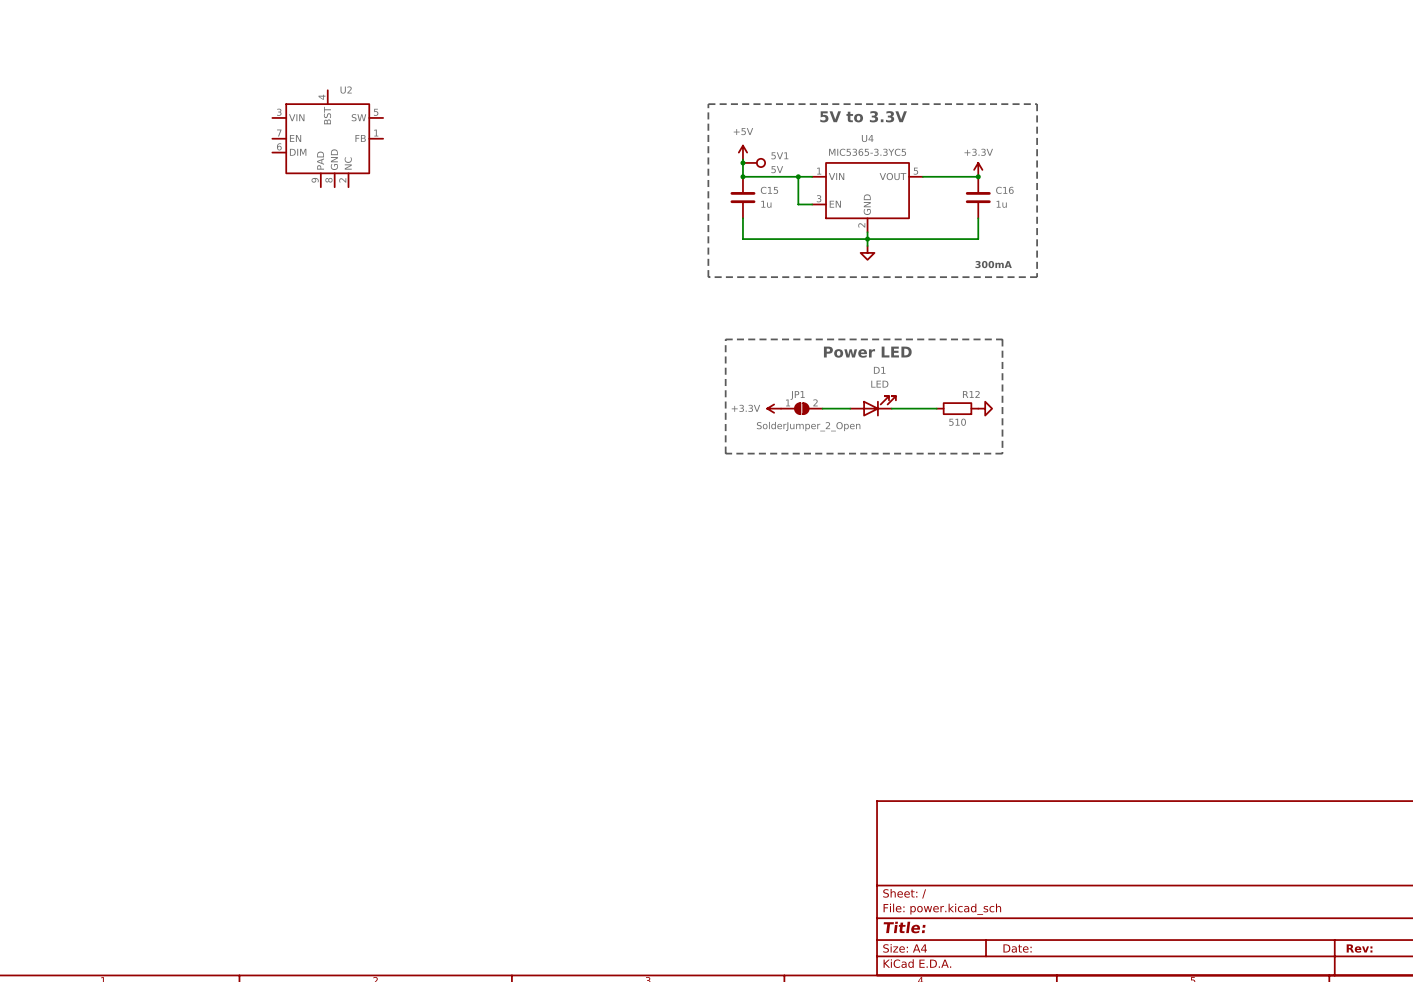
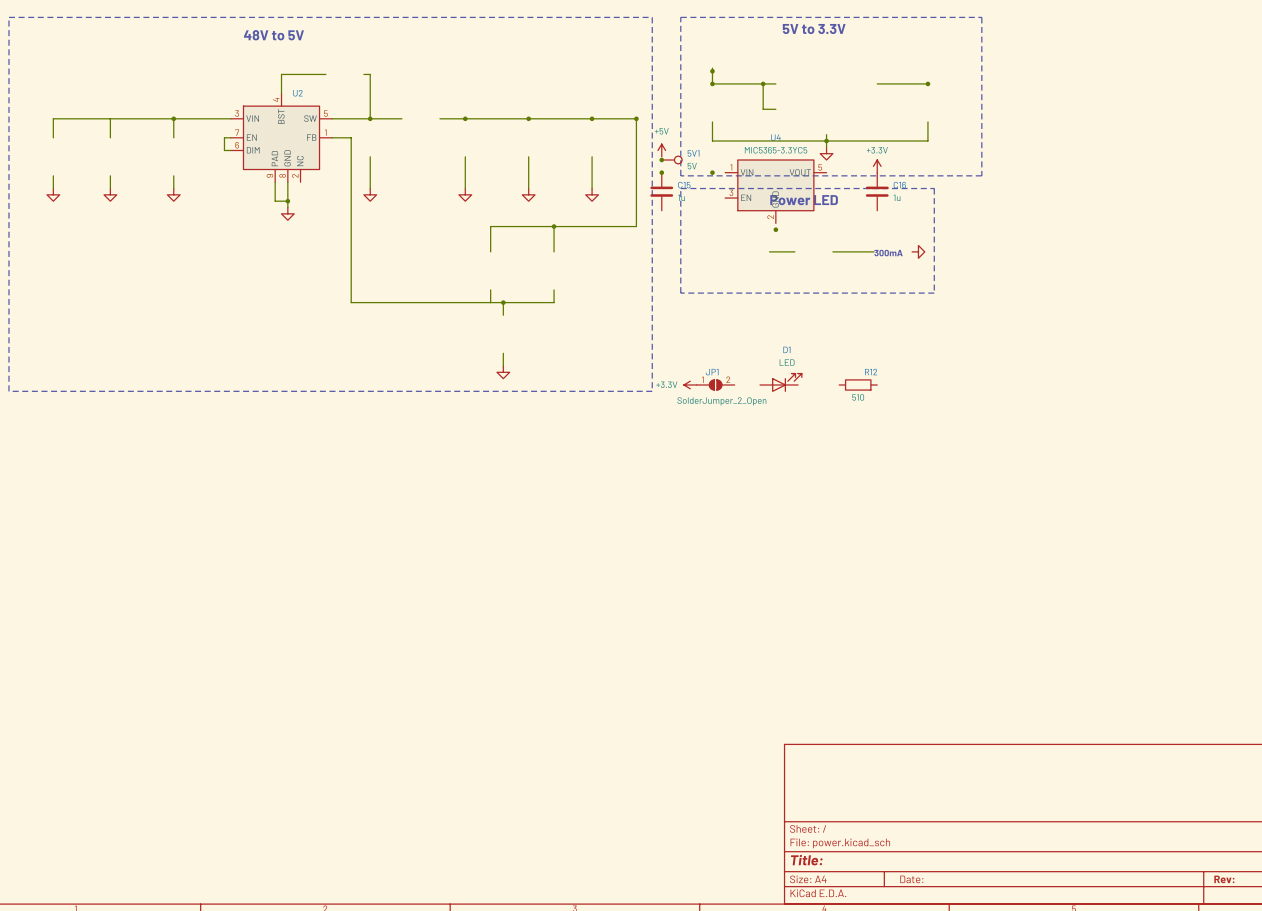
line: none -> (8, 17) (652, 17) (652, 391) (8, 391) (8, 17)
text: none -> 48V to 5V (273, 35)
junction: none -> (712, 71)
wire: none -> (325, 74) (281, 74) (281, 93)
wire: none -> (363, 74) (370, 74) (370, 118)
junction: none -> (712, 83)
junction: none -> (763, 83)
junction: none -> (927, 83)
line: (708, 104) (1037, 104) (1037, 277) (708, 277) (708, 104) -> (680, 17) (981, 17) (981, 175) (680, 175) (680, 17)
text position: 5V to 3.3V (863, 116) -> 5V to 3.3V (814, 29)
wire: none -> (110, 118) (110, 137)
wire: none -> (173, 118) (173, 137)
junction: none -> (173, 118)
wire: none -> (230, 118) (53, 118) (53, 137)
wire: none -> (332, 118) (401, 118)
junction: none -> (370, 118)
wire: none -> (439, 118) (636, 118) (636, 226) (490, 226) (490, 251)
junction: none -> (465, 118)
junction: none -> (528, 118)
junction: none -> (592, 118)
junction: none -> (636, 118)
wire: none -> (230, 137) (224, 137) (224, 150) (230, 150)
wire: none -> (332, 137) (351, 137) (351, 302) (554, 302) (554, 289)
junction: none -> (826, 140)
power symbol: none -> (826, 153)
wire: none -> (370, 156) (370, 188)
wire: none -> (465, 156) (465, 188)
wire: none -> (528, 156) (528, 188)
wire: none -> (592, 156) (592, 188)
wire: (742, 159) (742, 176) (812, 176) -> (712, 68) (712, 83) (775, 83)
wire: (798, 176) (798, 204) (812, 204) -> (763, 83) (763, 109) (775, 109)
wire: (922, 176) (978, 176) -> (877, 83) (927, 83)
junction: (978, 176) -> none
wire: none -> (53, 175) (53, 188)
wire: none -> (110, 175) (110, 188)
wire: none -> (173, 175) (173, 188)
wire: none -> (275, 182) (275, 201) (287, 201)
wire: none -> (287, 182) (287, 207)
line: none -> (680, 188) (680, 293) (934, 293) (934, 188) (680, 188)
power symbol: none -> (53, 194)
power symbol: none -> (110, 194)
power symbol: none -> (173, 194)
power symbol: none -> (370, 194)
power symbol: none -> (465, 194)
power symbol: none -> (528, 194)
power symbol: none -> (592, 194)
text: none -> Power LED (804, 200)
junction: none -> (287, 201)
wire: (742, 218) (742, 239) (978, 239) (978, 218) -> (712, 121) (712, 140) (927, 140) (927, 121)
power symbol: none -> (287, 213)
wire: (867, 232) (867, 246) -> (826, 134) (826, 147)
wire: none -> (554, 226) (554, 251)
junction: none -> (554, 226)
power symbol: (867, 252) -> none
wire: none -> (769, 251) (794, 251)
wire: none -> (832, 251) (874, 251)
power symbol: none -> (918, 251)
wire: none -> (490, 289) (490, 302)
wire: none -> (503, 302) (503, 315)
junction: none -> (503, 302)
line: (725, 339) (1002, 339) (1002, 453) (725, 453) (725, 339) -> none
text: Power LED (867, 352) -> none
wire: none -> (503, 353) (503, 365)
power symbol: none -> (503, 372)
wire: (822, 408) (850, 408) -> none
wire: (891, 408) (936, 408) -> none
power symbol: (985, 408) -> none

